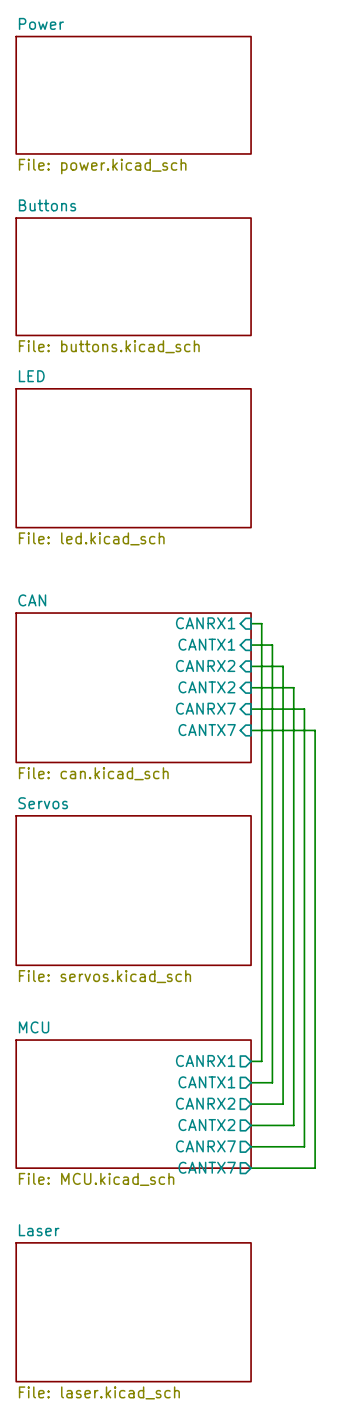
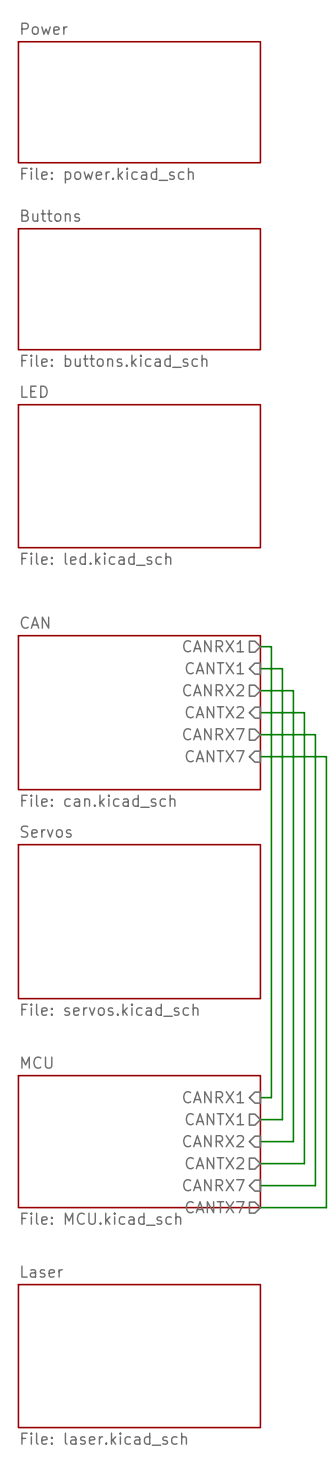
sheet pin shape: input (205, 623) -> output (213, 646)
sheet pin shape: input (205, 666) -> output (213, 690)
sheet pin shape: input (205, 708) -> output (213, 734)
sheet pin shape: output (205, 1060) -> input (213, 1097)
sheet pin shape: output (205, 1103) -> input (213, 1141)
sheet pin shape: output (205, 1146) -> input (213, 1185)

